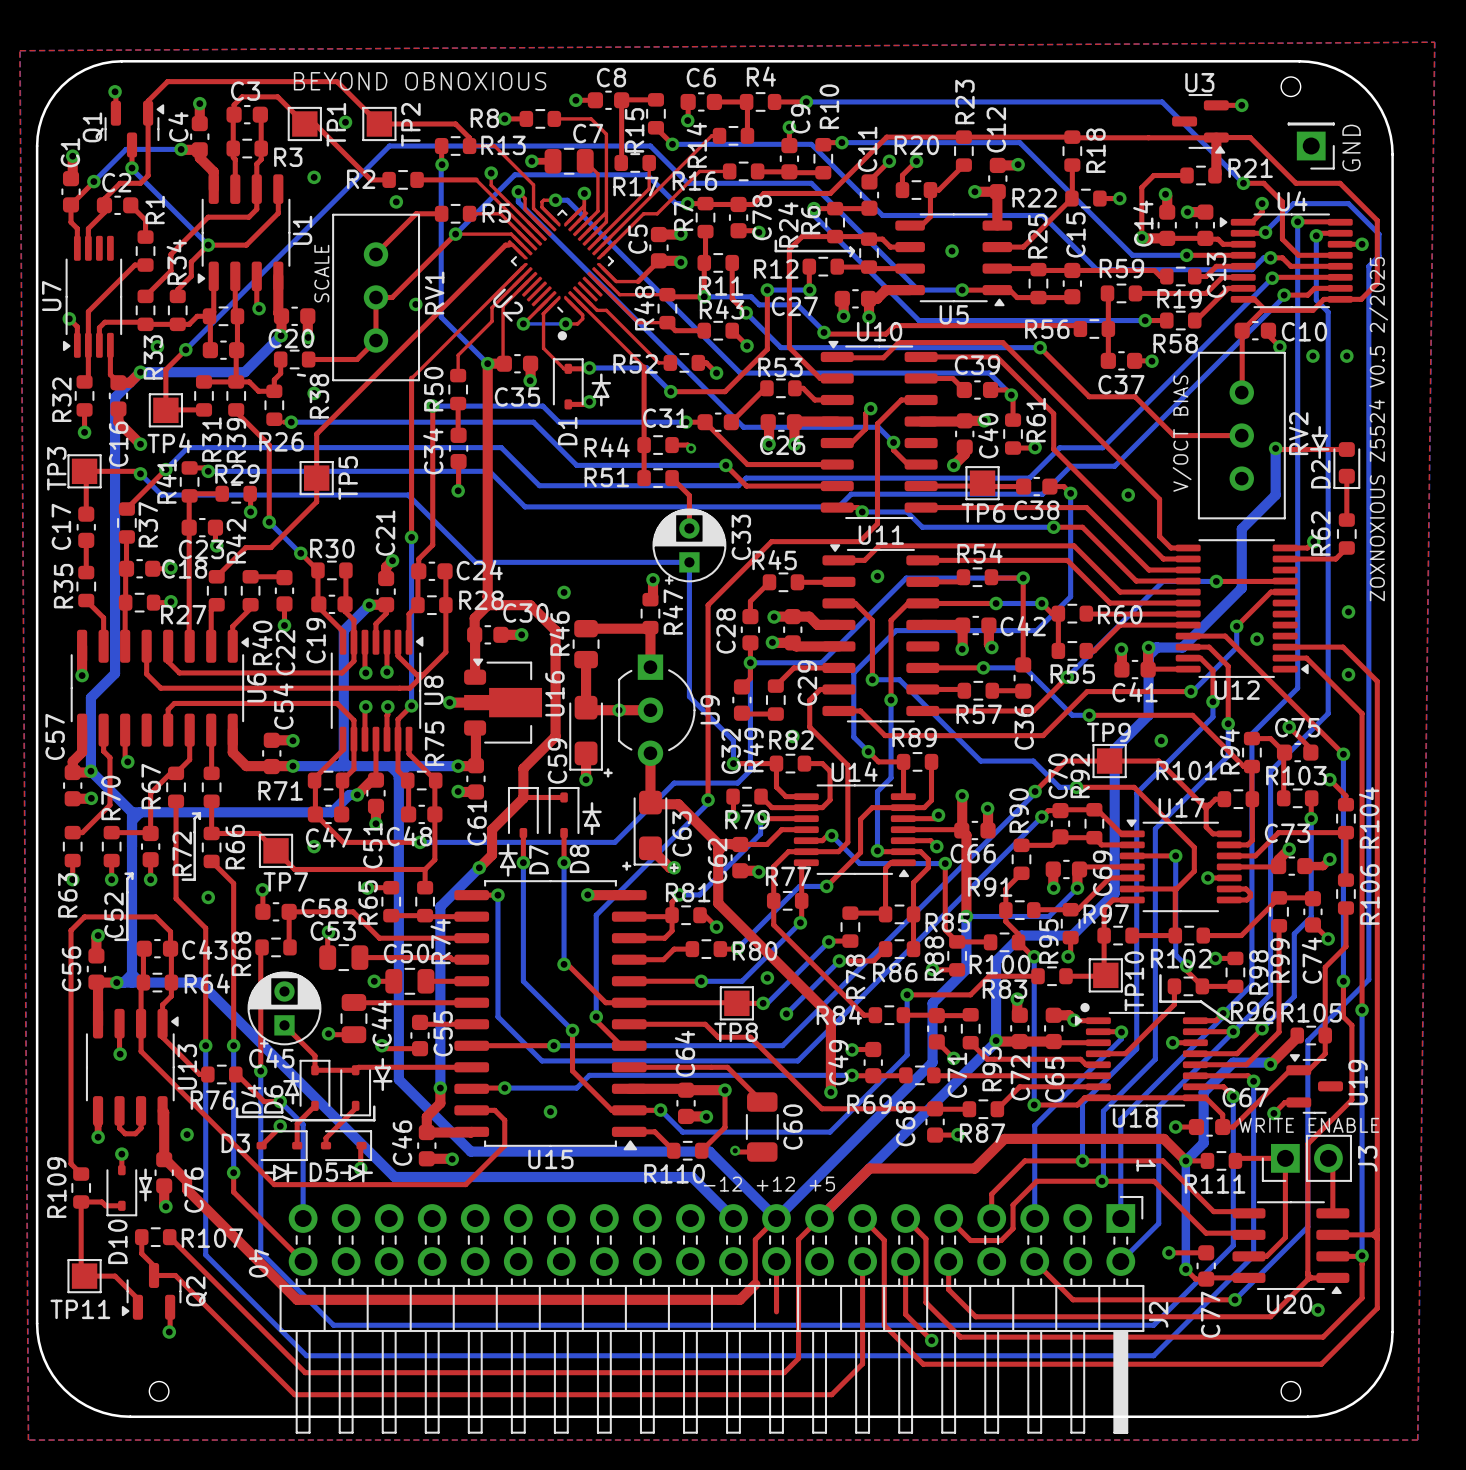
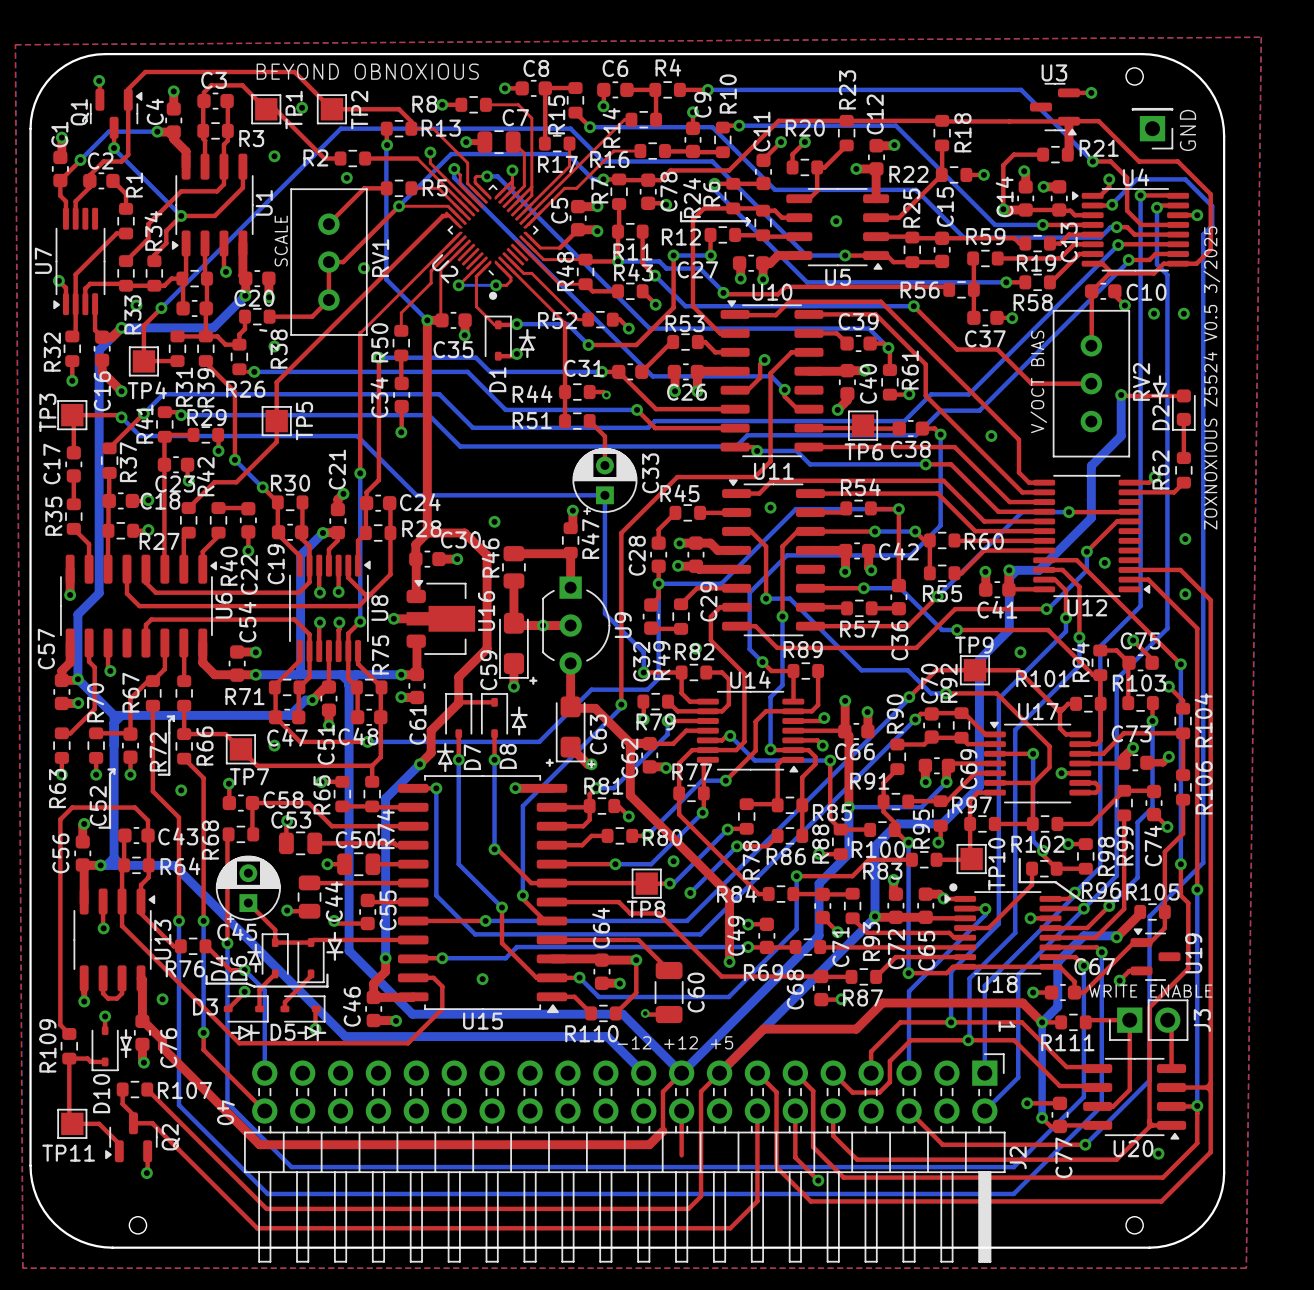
text: ZOXNOXIOUS Z5524 V0.5 2/2025 (1378, 429) -> ZOXNOXIOUS Z5524 V0.5 3/2025 (1211, 378)

